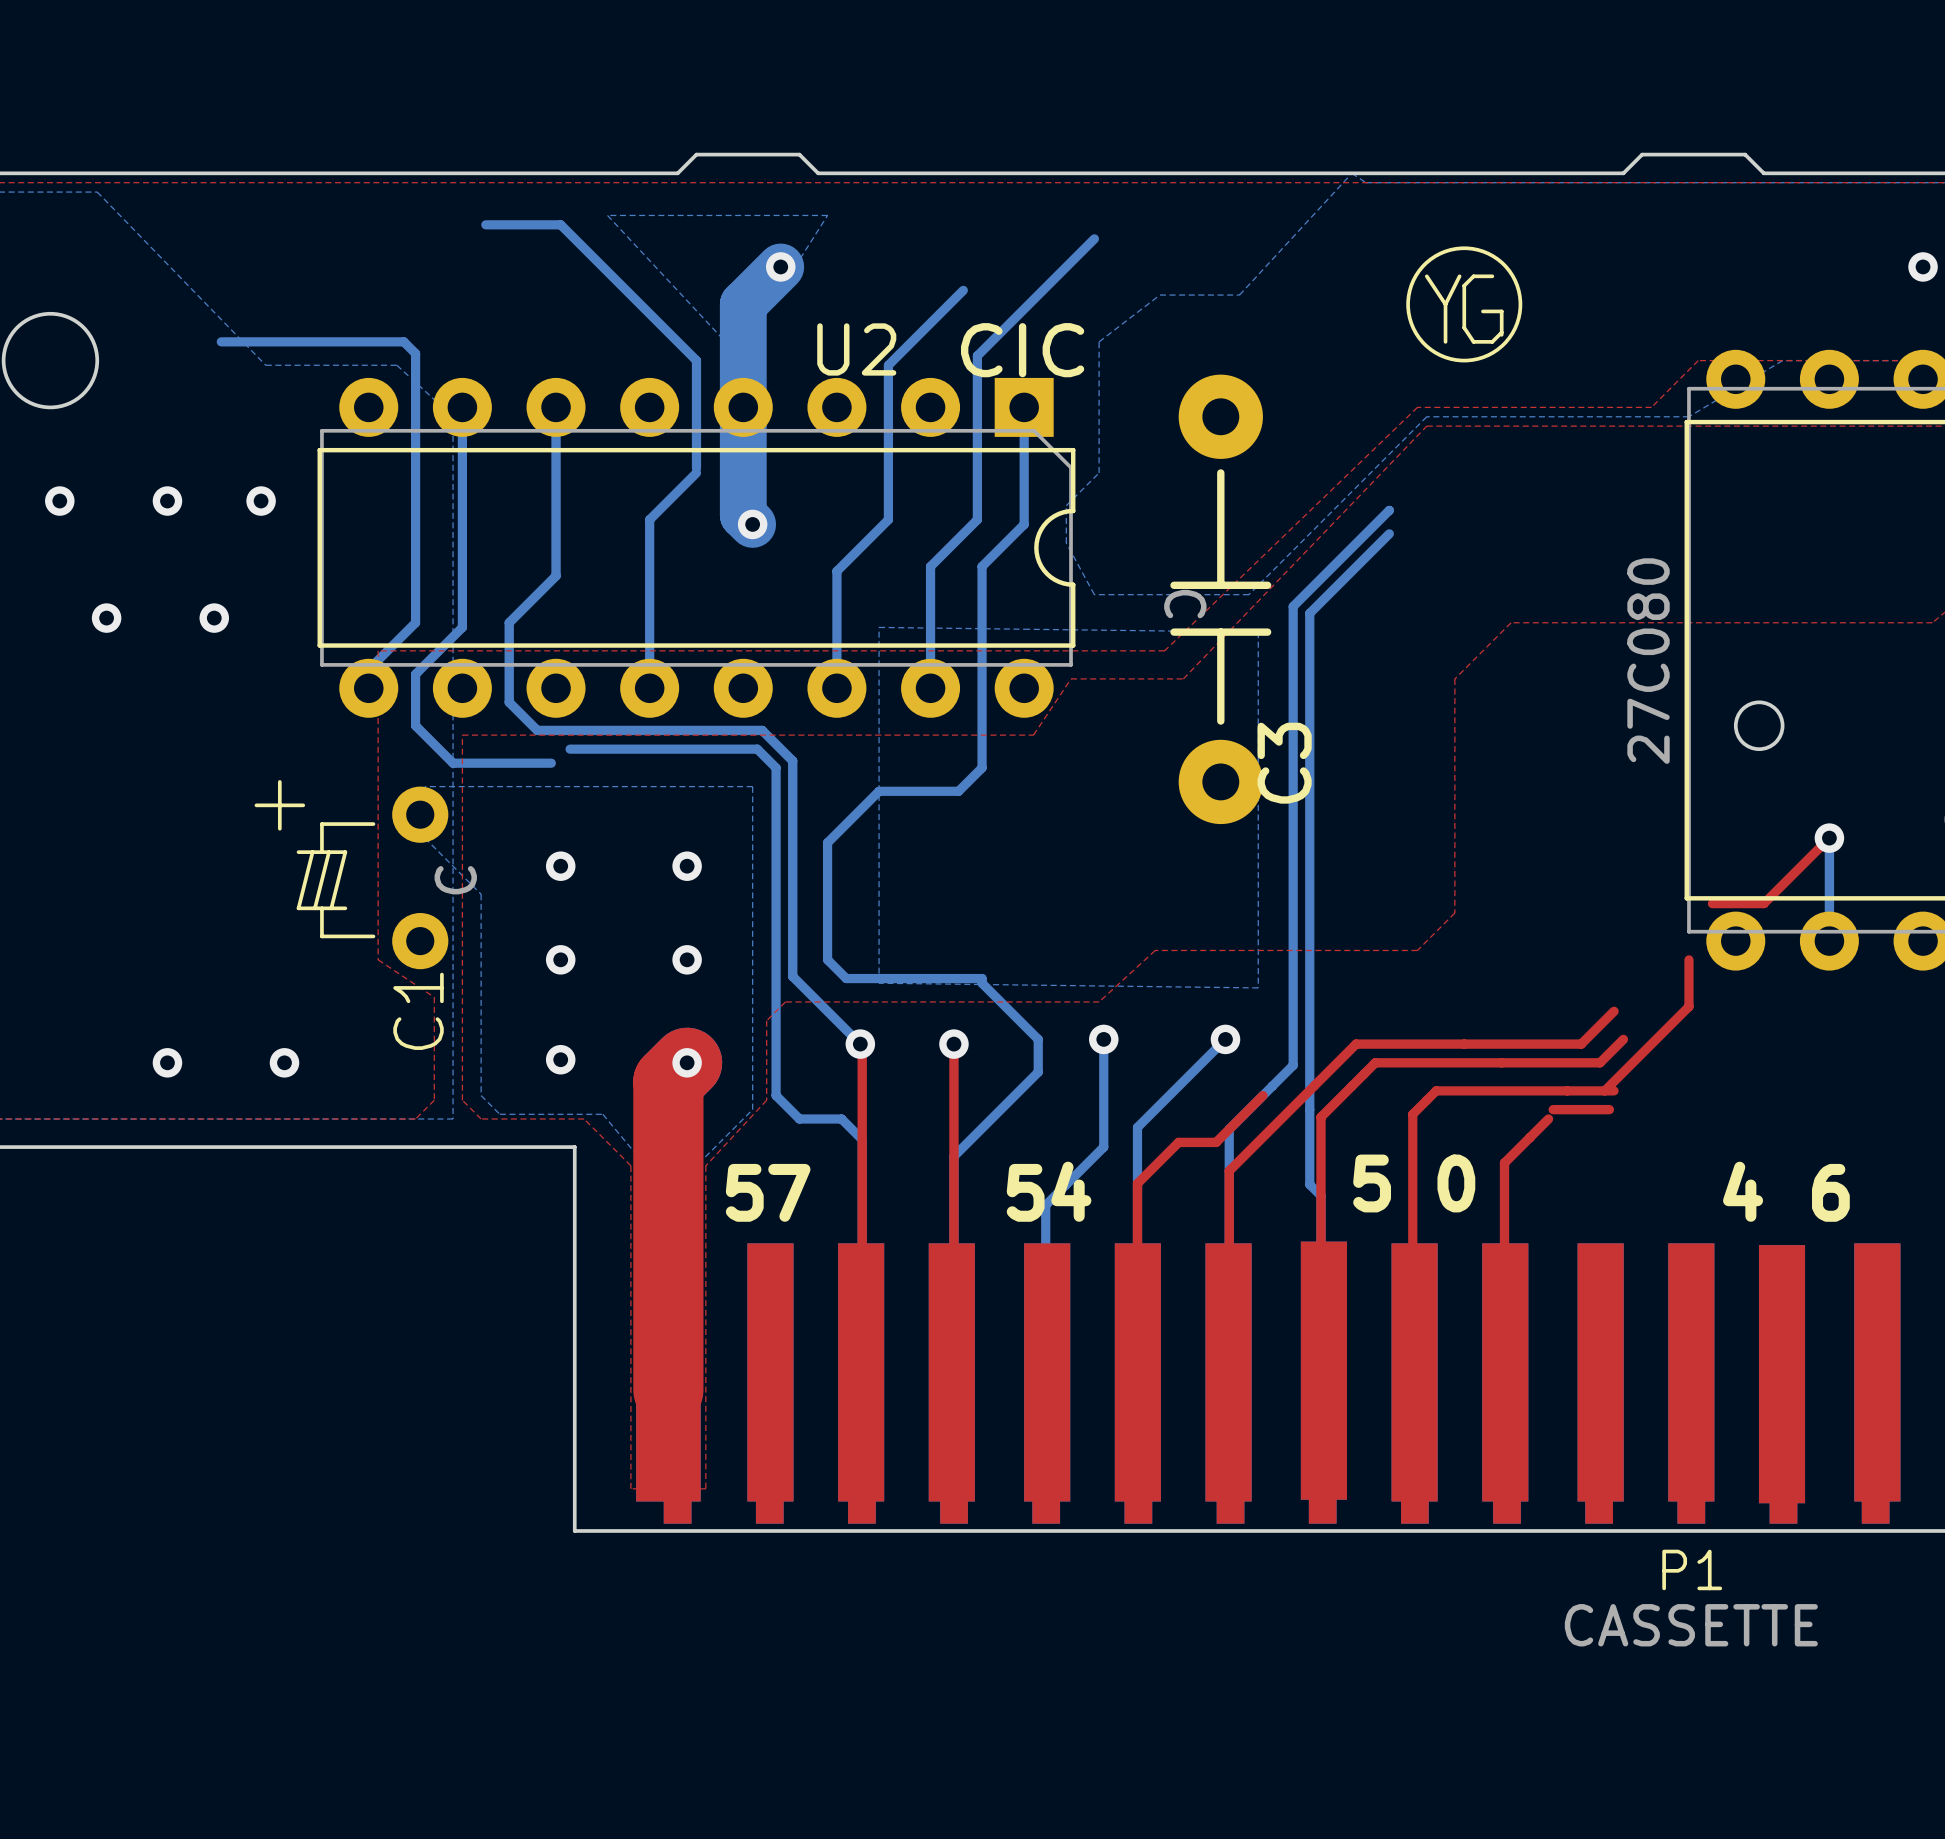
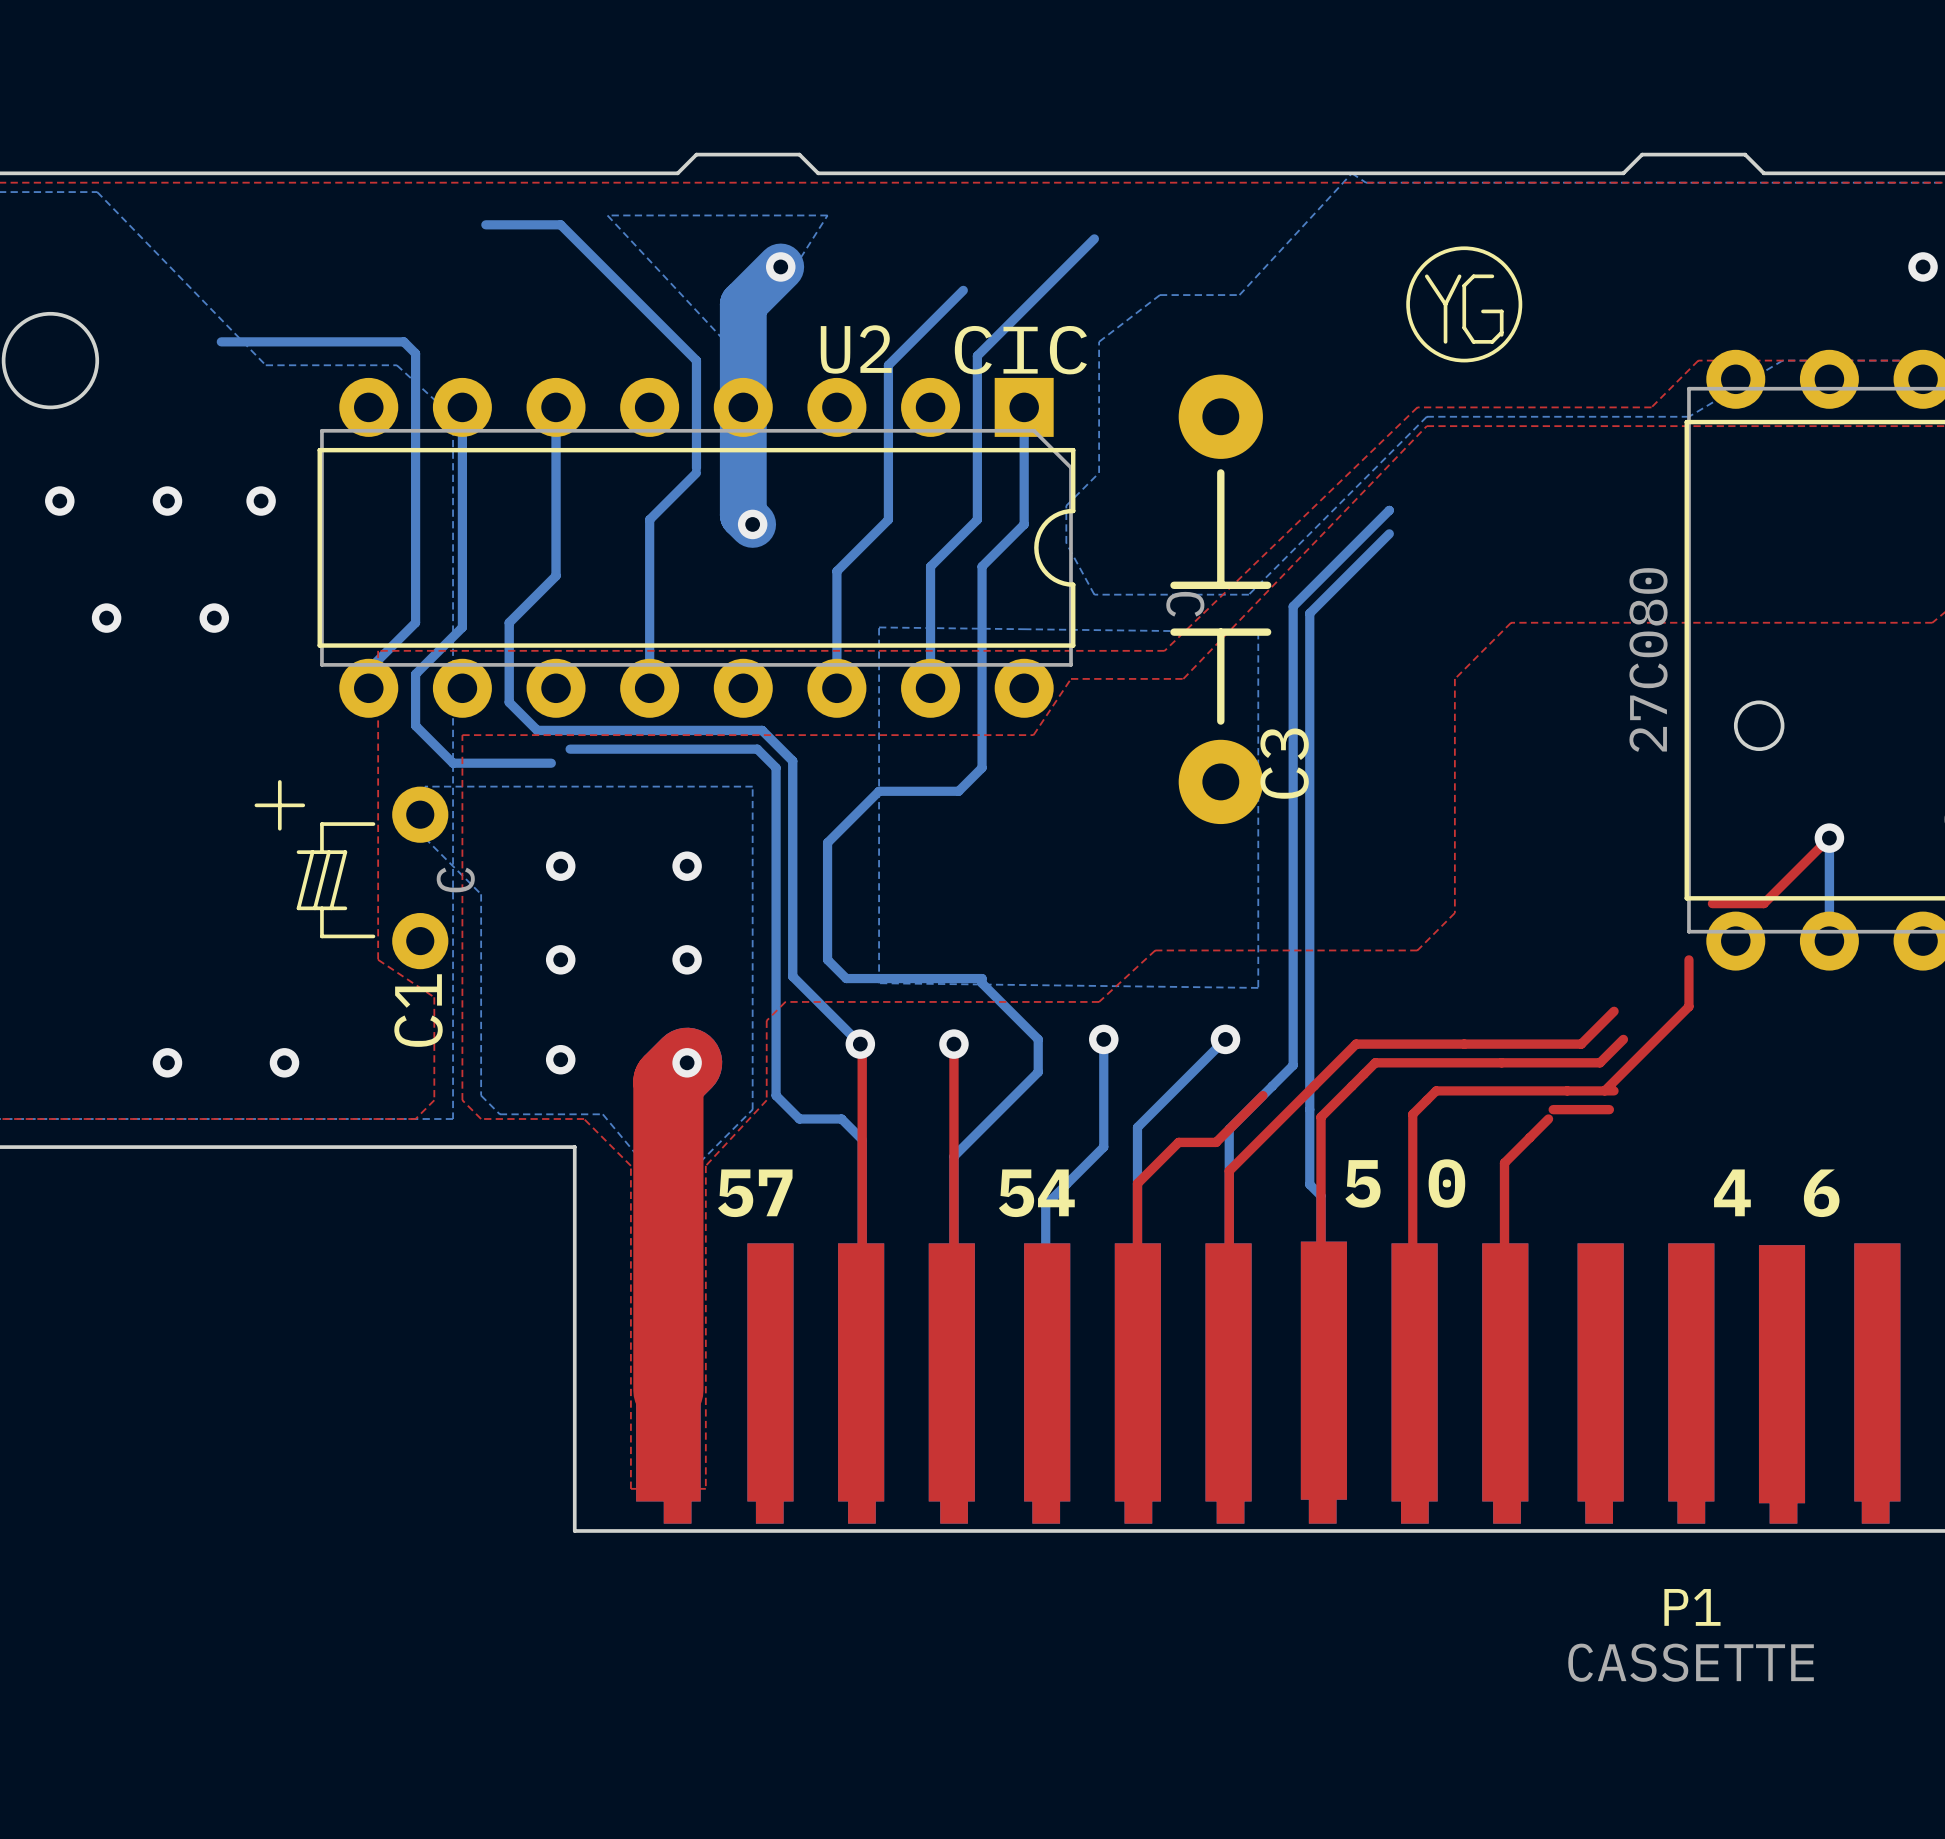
P1 name position: P1 (1692, 1569) -> P1 (1692, 1607)
P1 value position: CASSETTE (1691, 1625) -> CASSETTE (1691, 1662)

